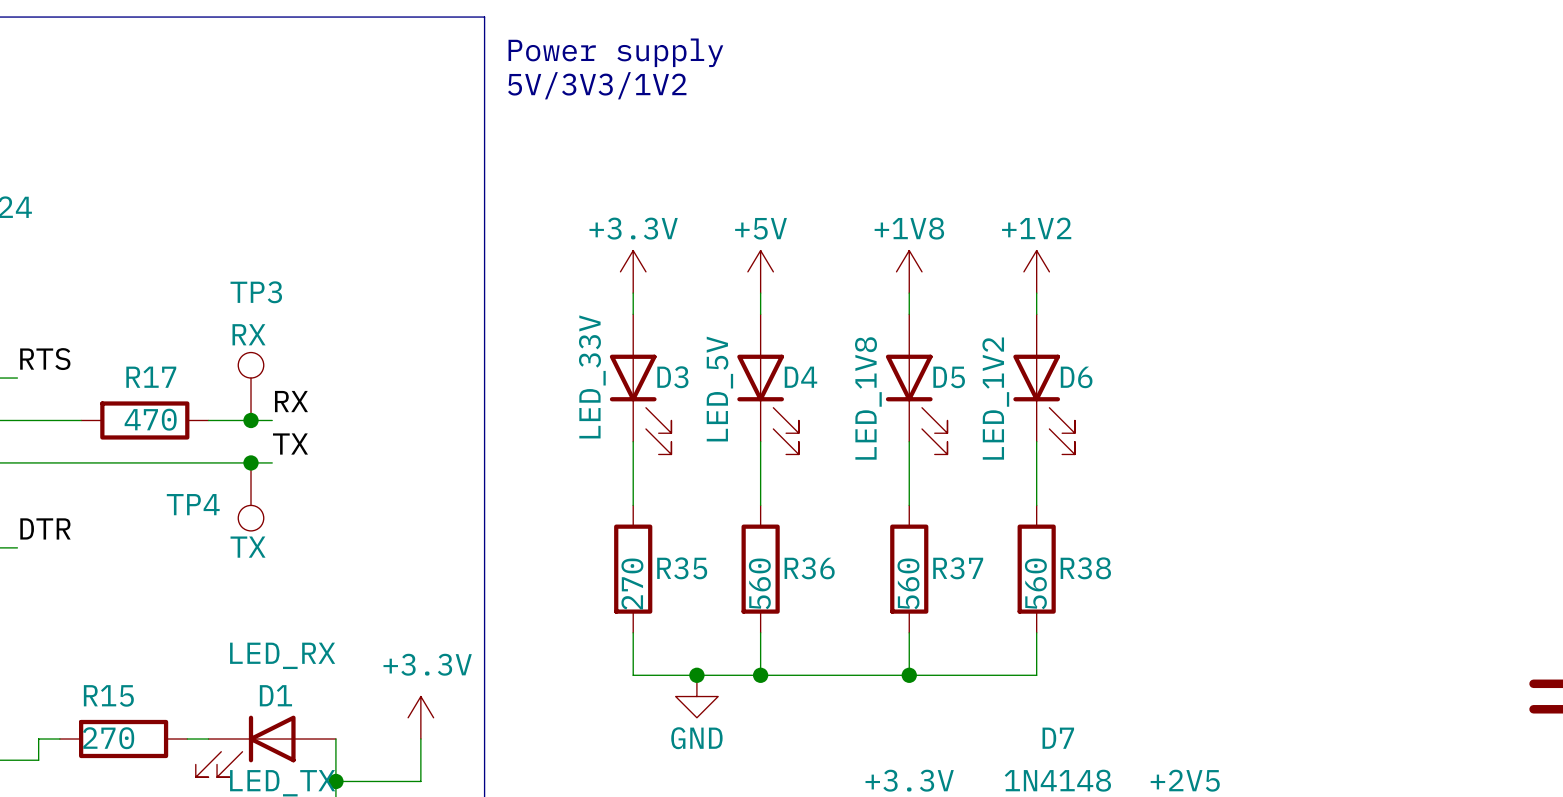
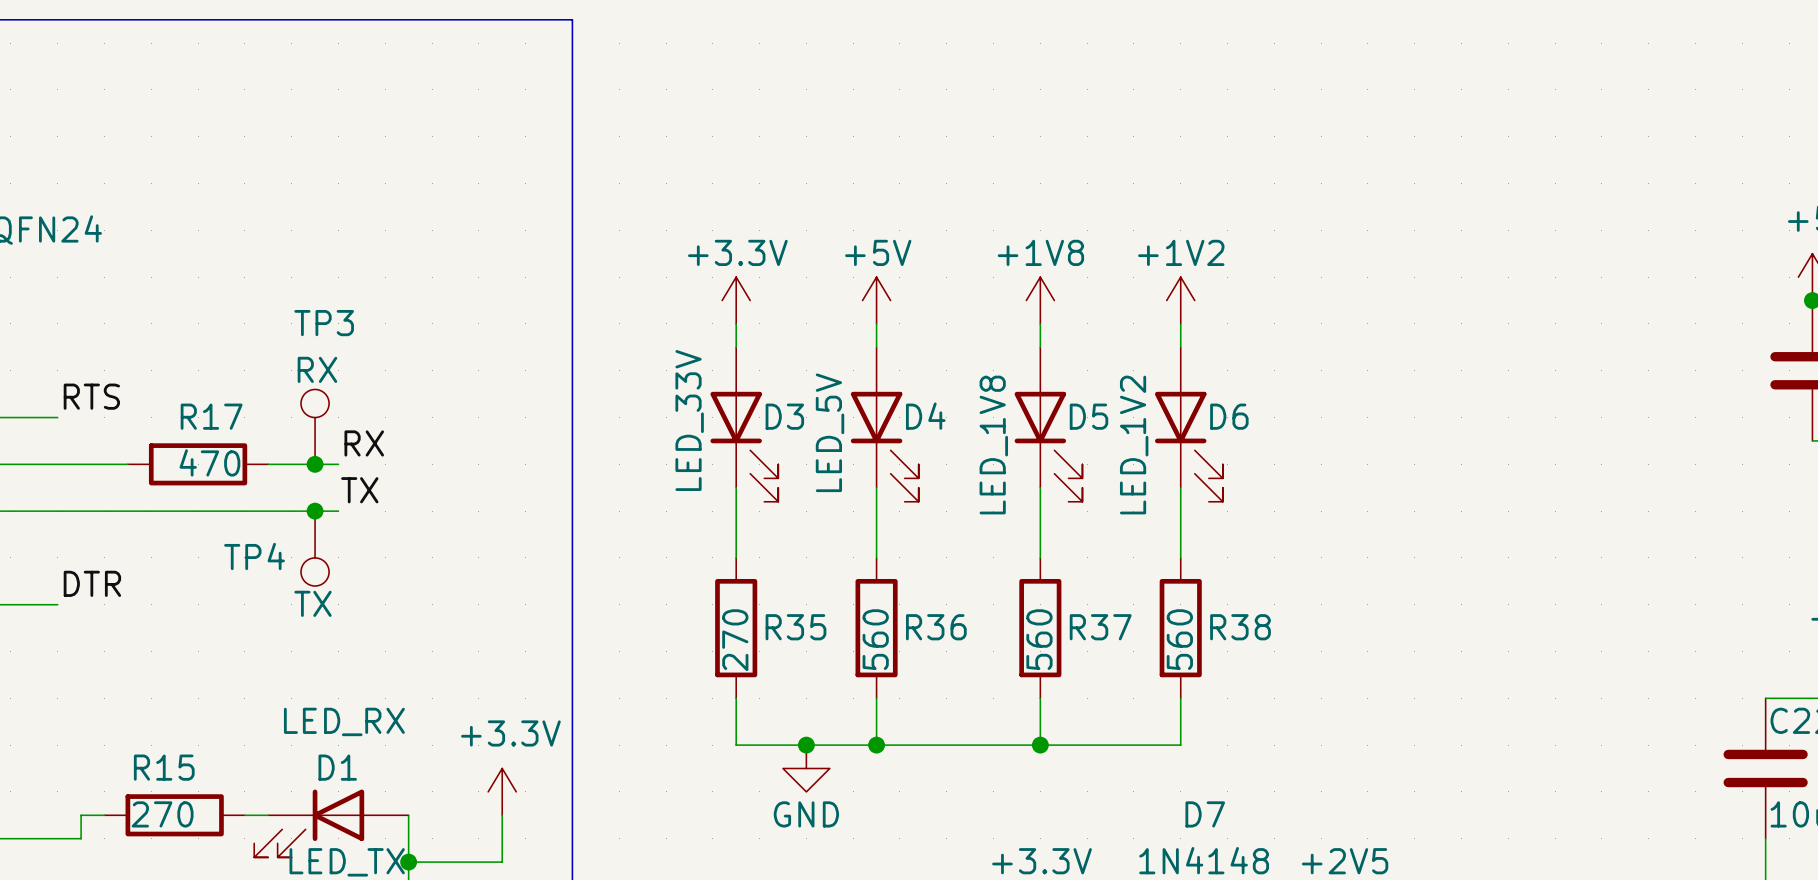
text: Power supply (615, 52) -> none
text: 5V/3V3/1V2 (597, 85) -> none

